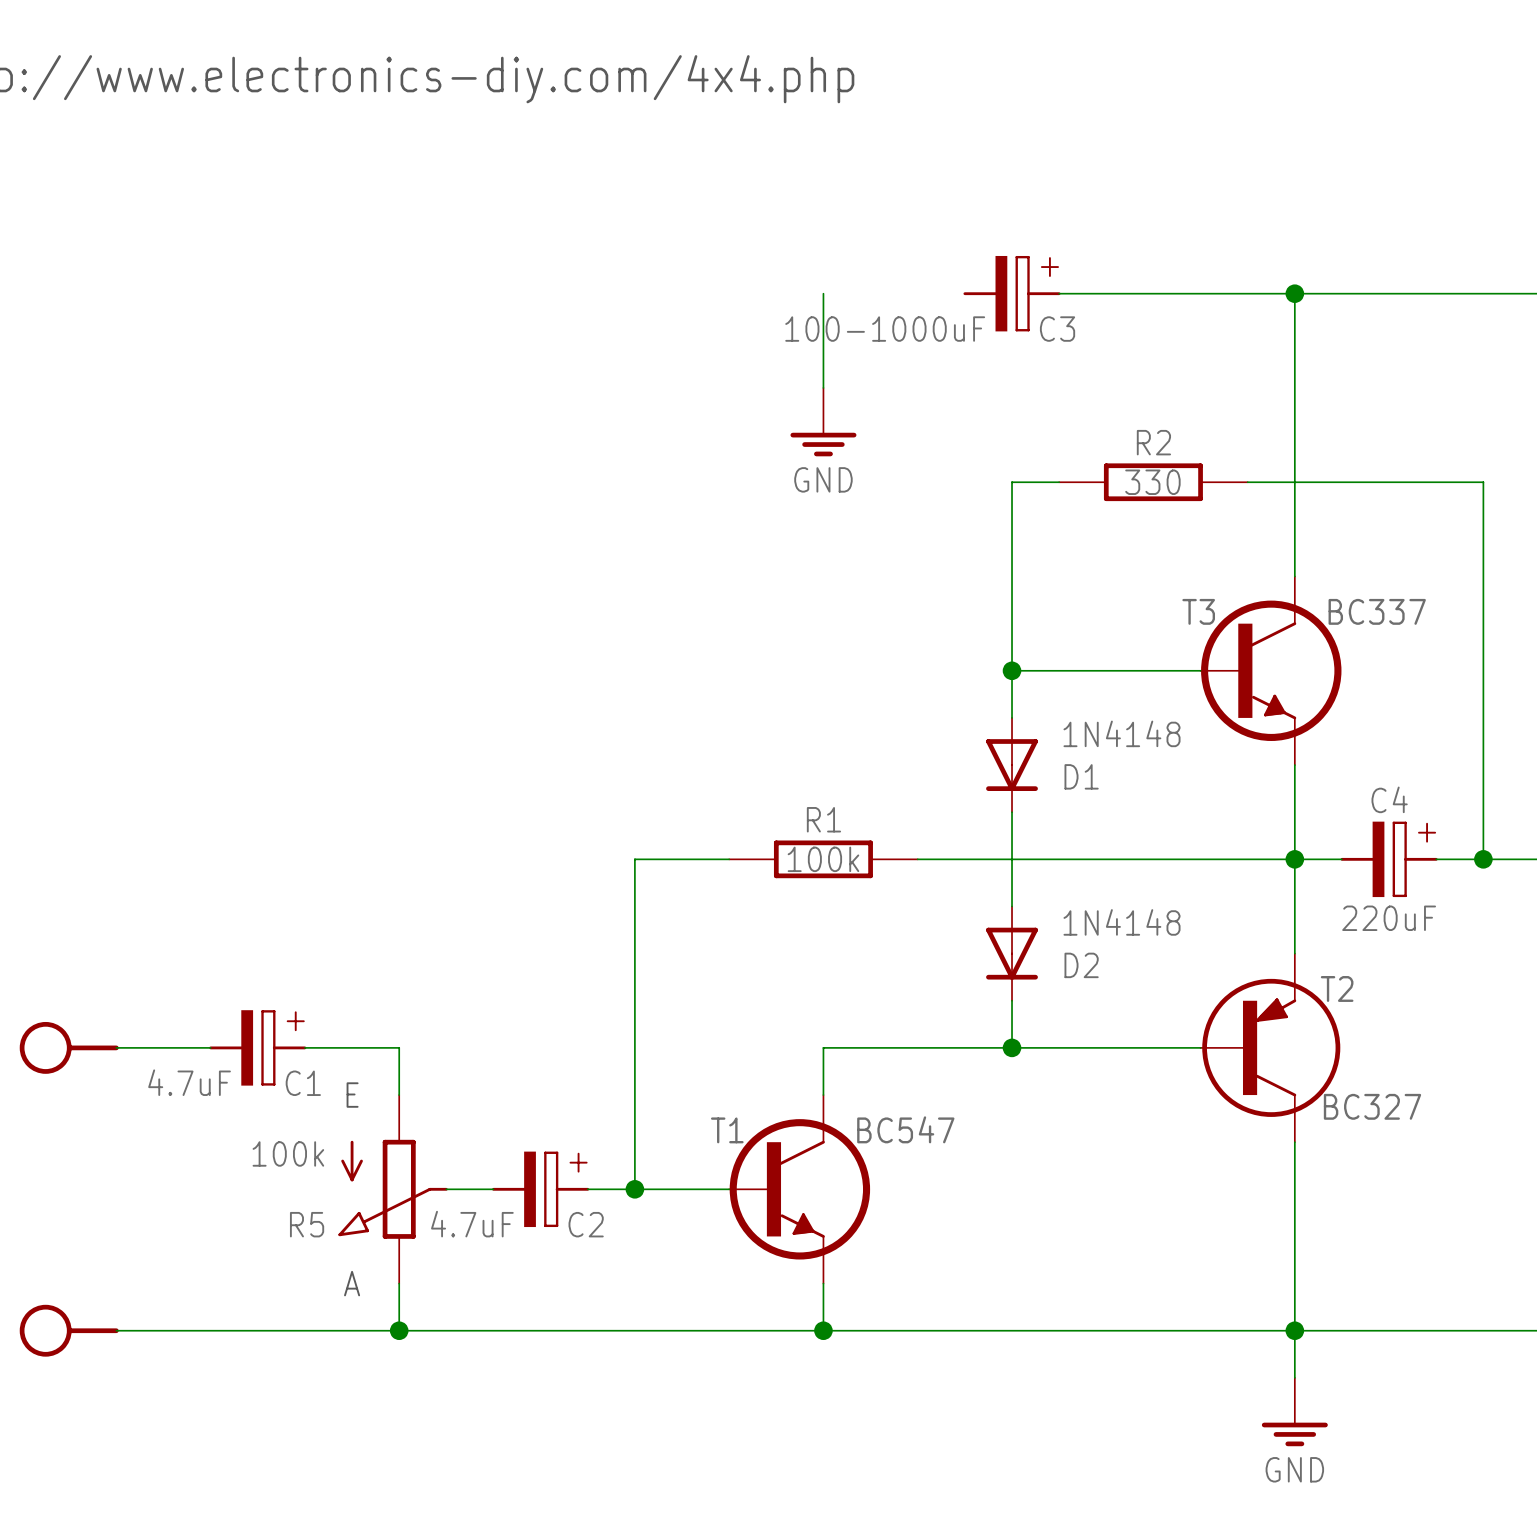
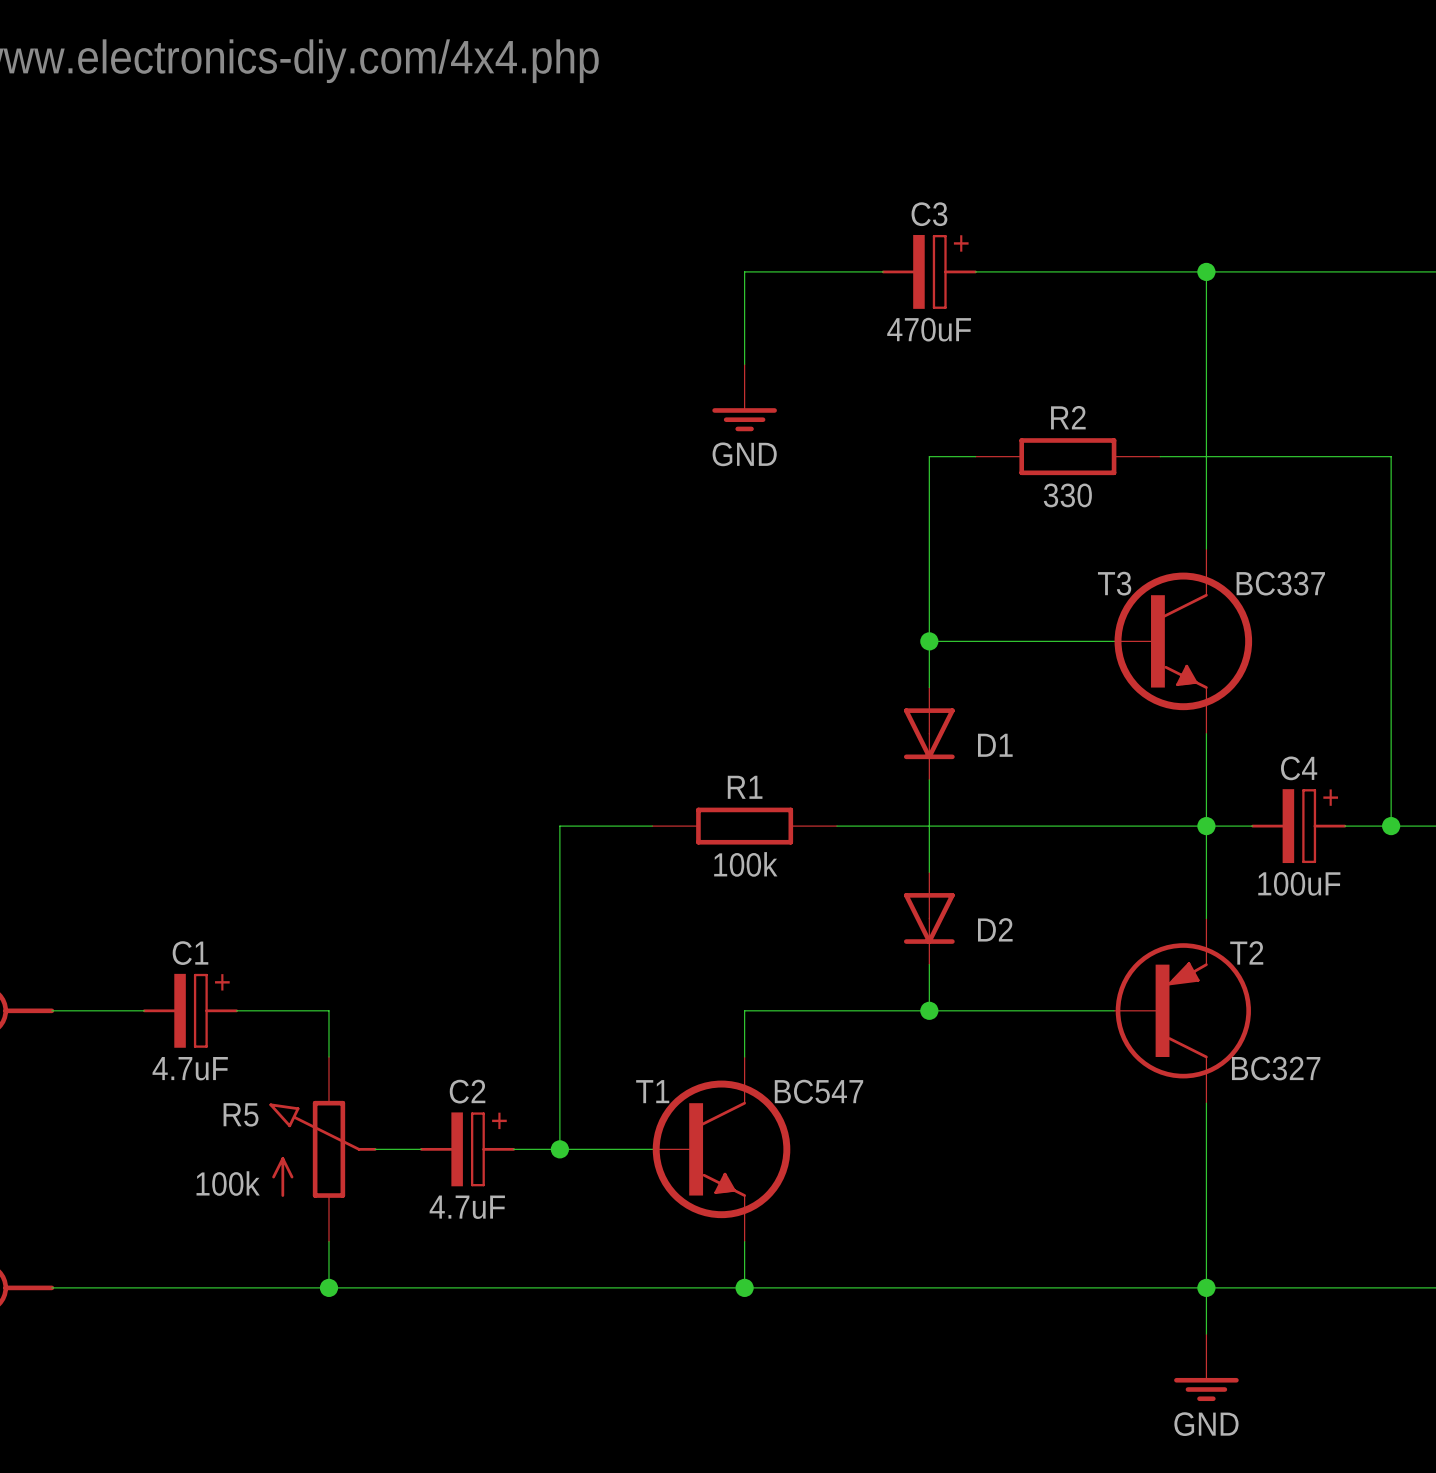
wire: none -> (744, 271) (883, 271)
C3 value: 100-1000uF (885, 329) -> 470uF (929, 329)
C3 name position: C3 (1057, 329) -> C3 (929, 214)
R2 value position: 330 (1152, 482) -> 330 (1067, 495)
D1 value: 1N4148 (1122, 733) -> none
R1 value position: 100k (823, 859) -> 100k (745, 864)
C4 value: 220uF (1389, 918) -> 100uF (1299, 883)
D2 value: 1N4148 (1122, 922) -> none
C1 value position: 4.7uF (189, 1082) -> 4.7uF (190, 1068)
C1 name position: C1 (303, 1083) -> C1 (190, 953)
R5 symbol: [338, 1095, 448, 1284] -> [269, 1056, 377, 1242]
R5 value position: 100k (288, 1153) -> 100k (228, 1183)
R5 name position: R5 (307, 1224) -> R5 (241, 1114)
C2 value position: 4.7uF (472, 1224) -> 4.7uF (467, 1207)
C2 name position: C2 (586, 1224) -> C2 (467, 1091)

